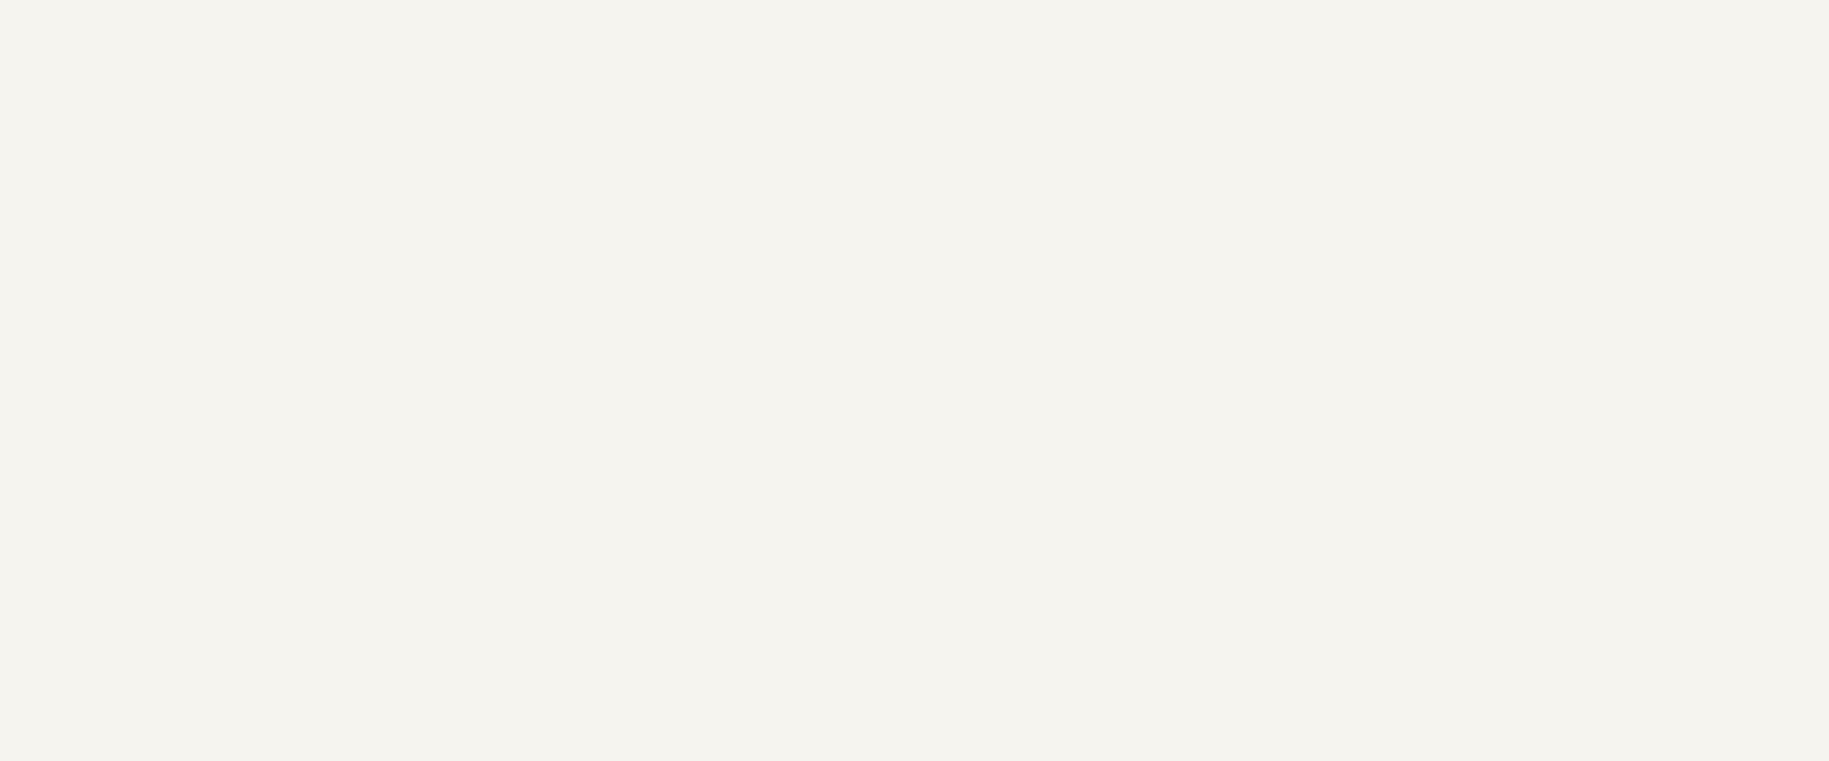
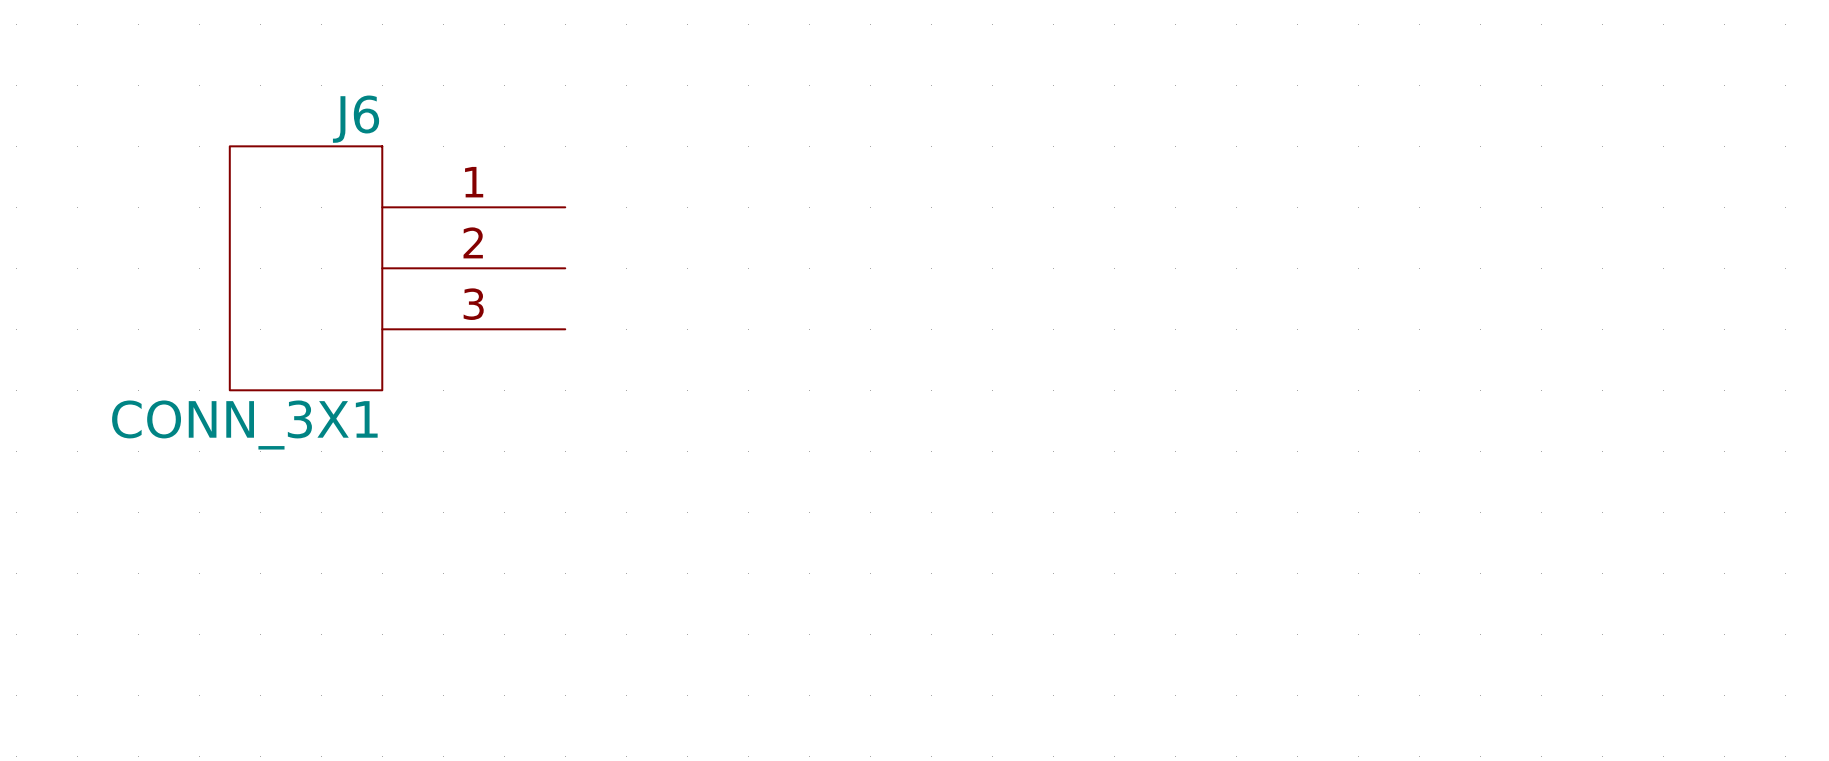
J6: none -> CONN_3X1 (397, 268)

